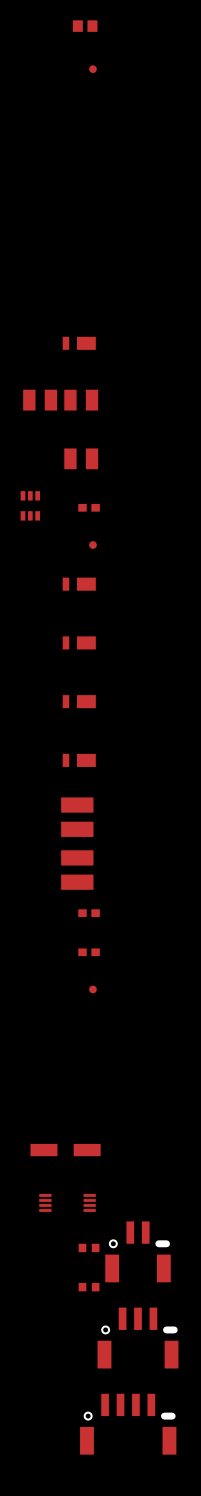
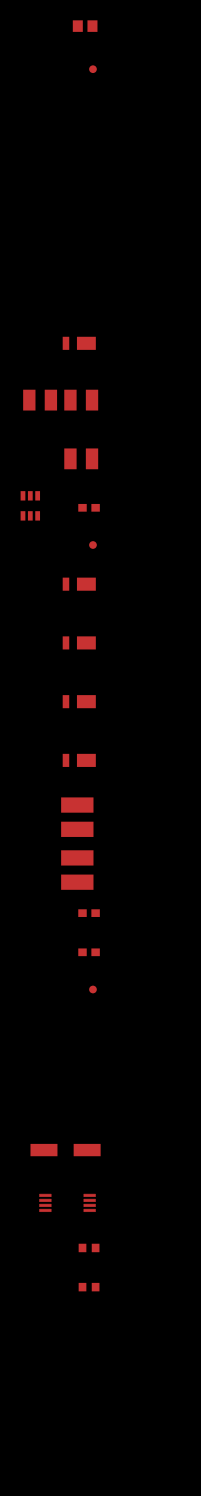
part: (138, 1251) -> none
part: (138, 1338) -> none
part: (128, 1424) -> none

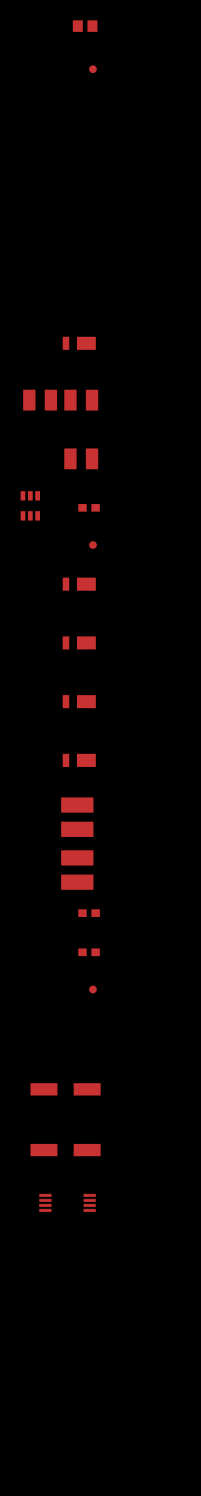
part: none -> (65, 1089)
part: (89, 1247) -> none
part: (89, 1287) -> none

